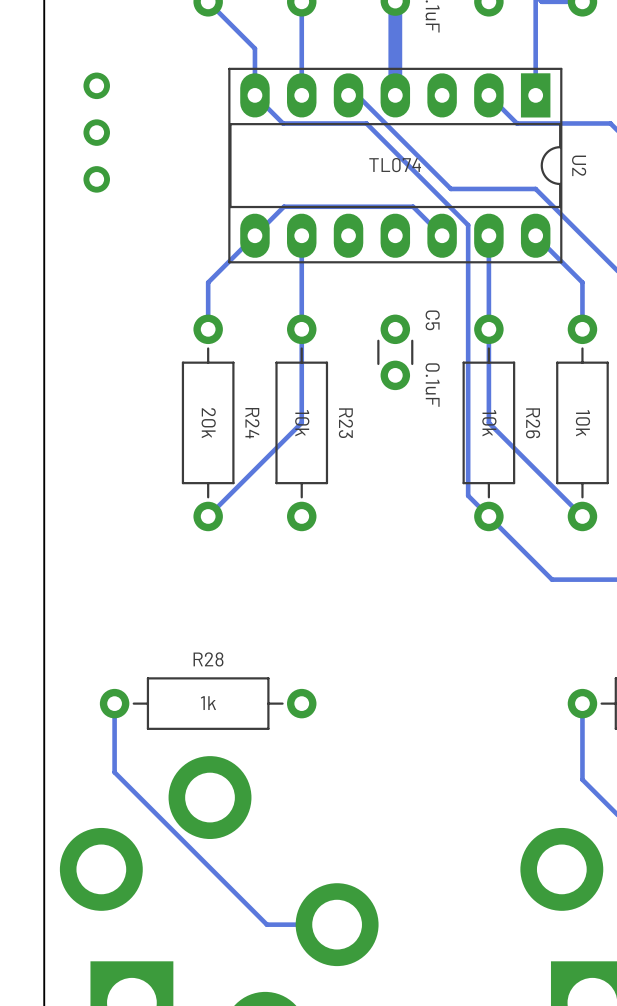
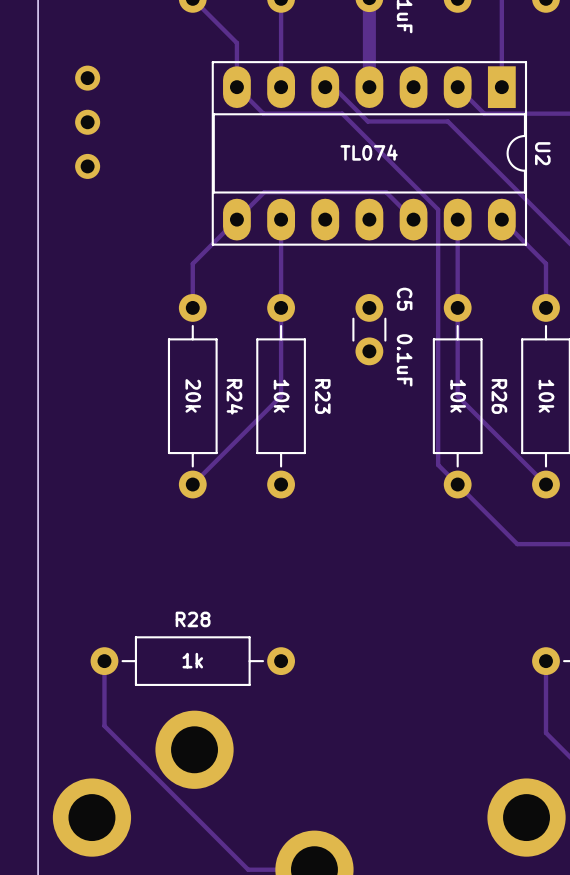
track: (393, 131) (450, 188) (535, 188) -> (367, 121) (447, 121) (501, 175)

